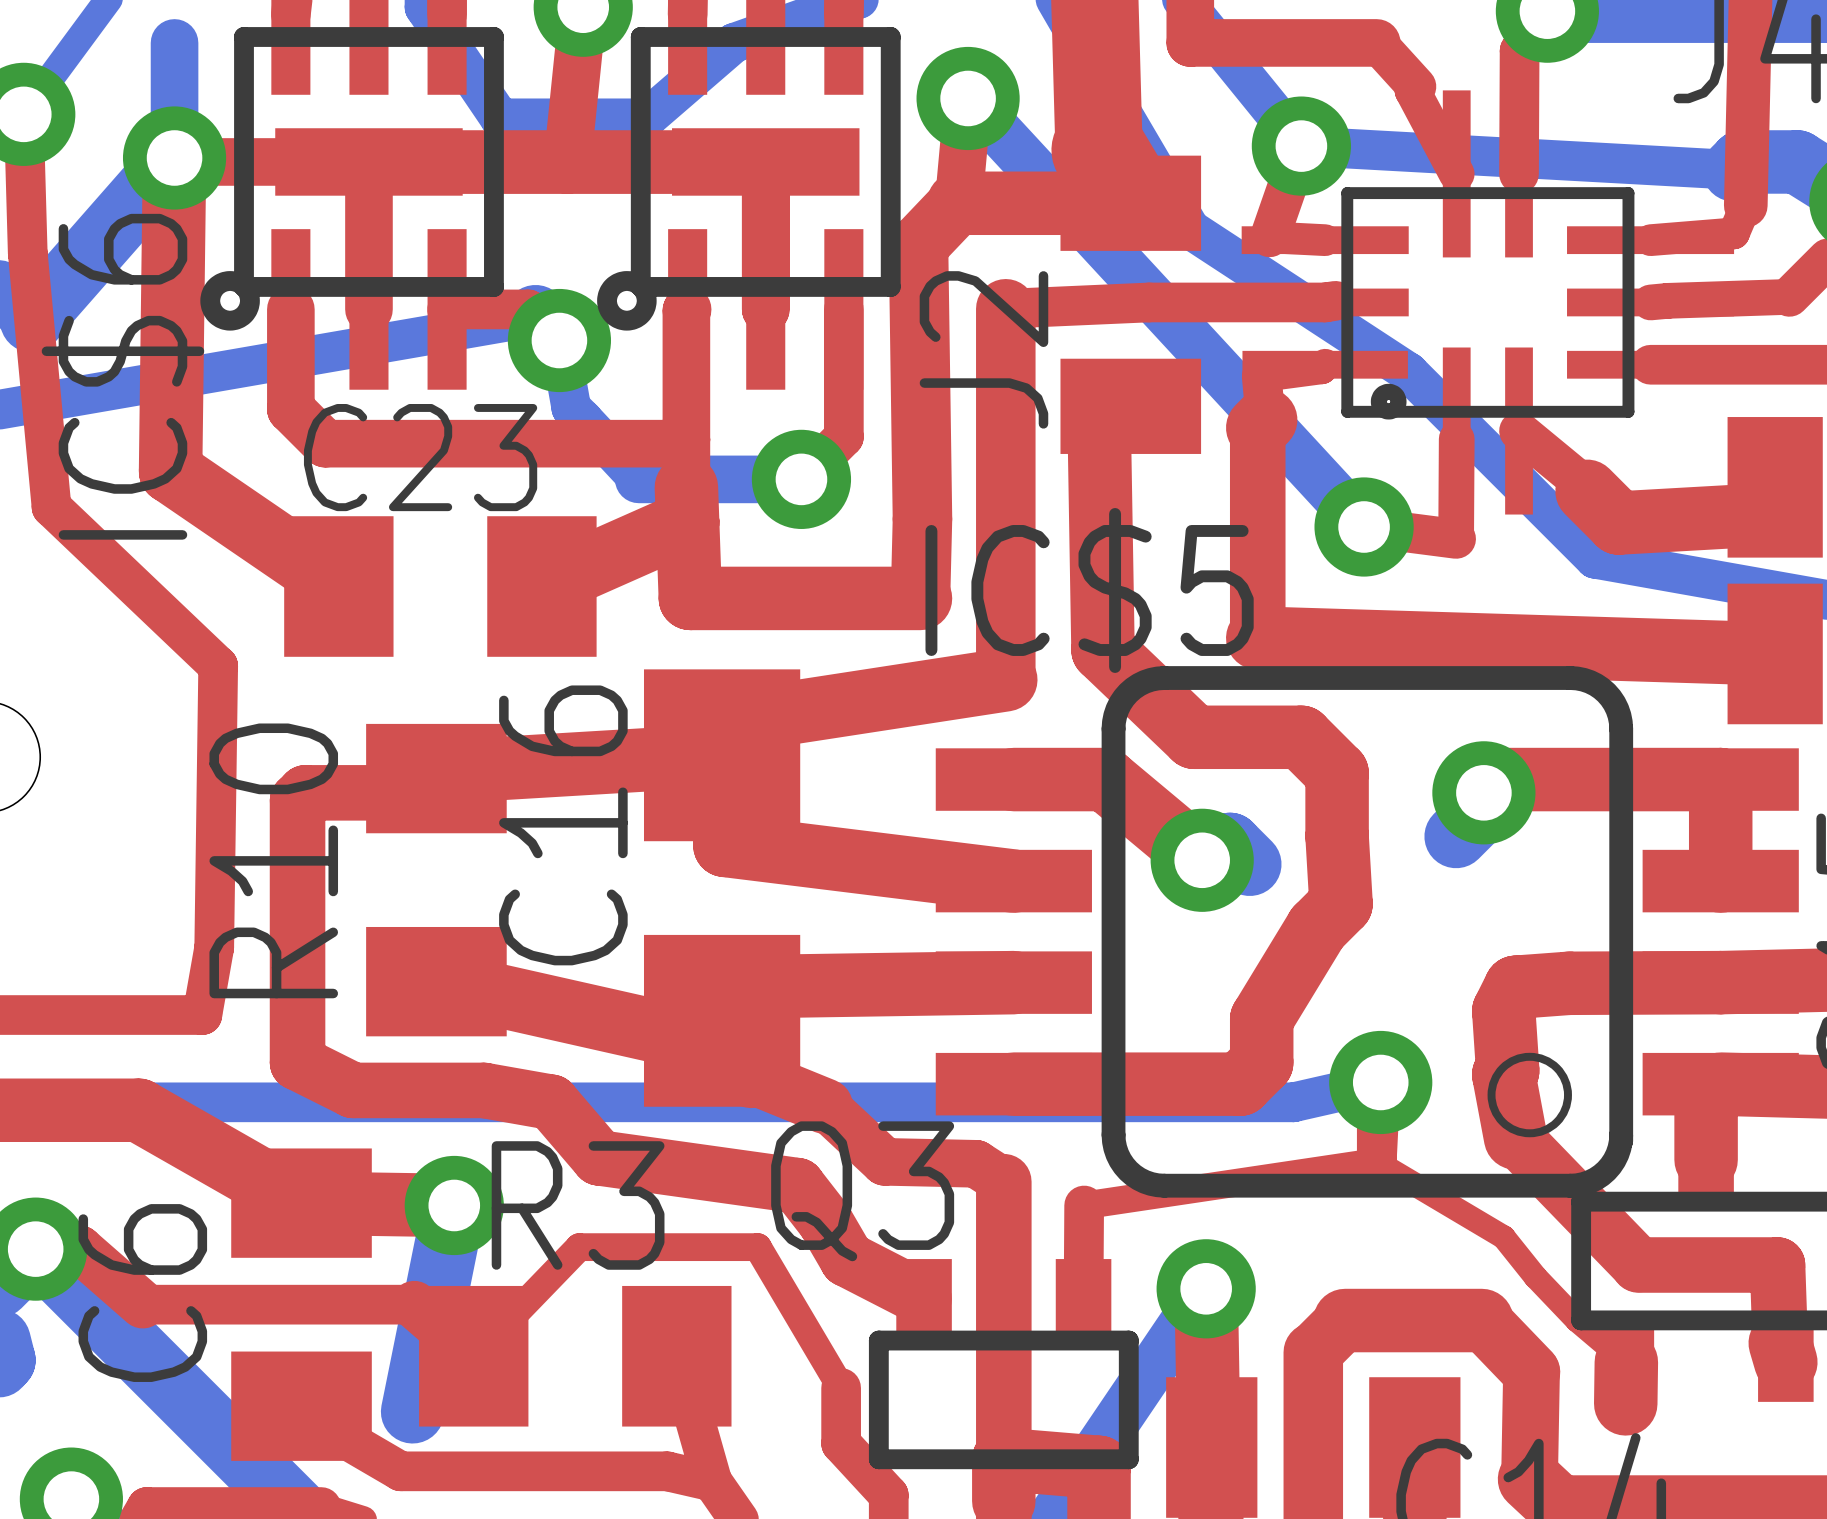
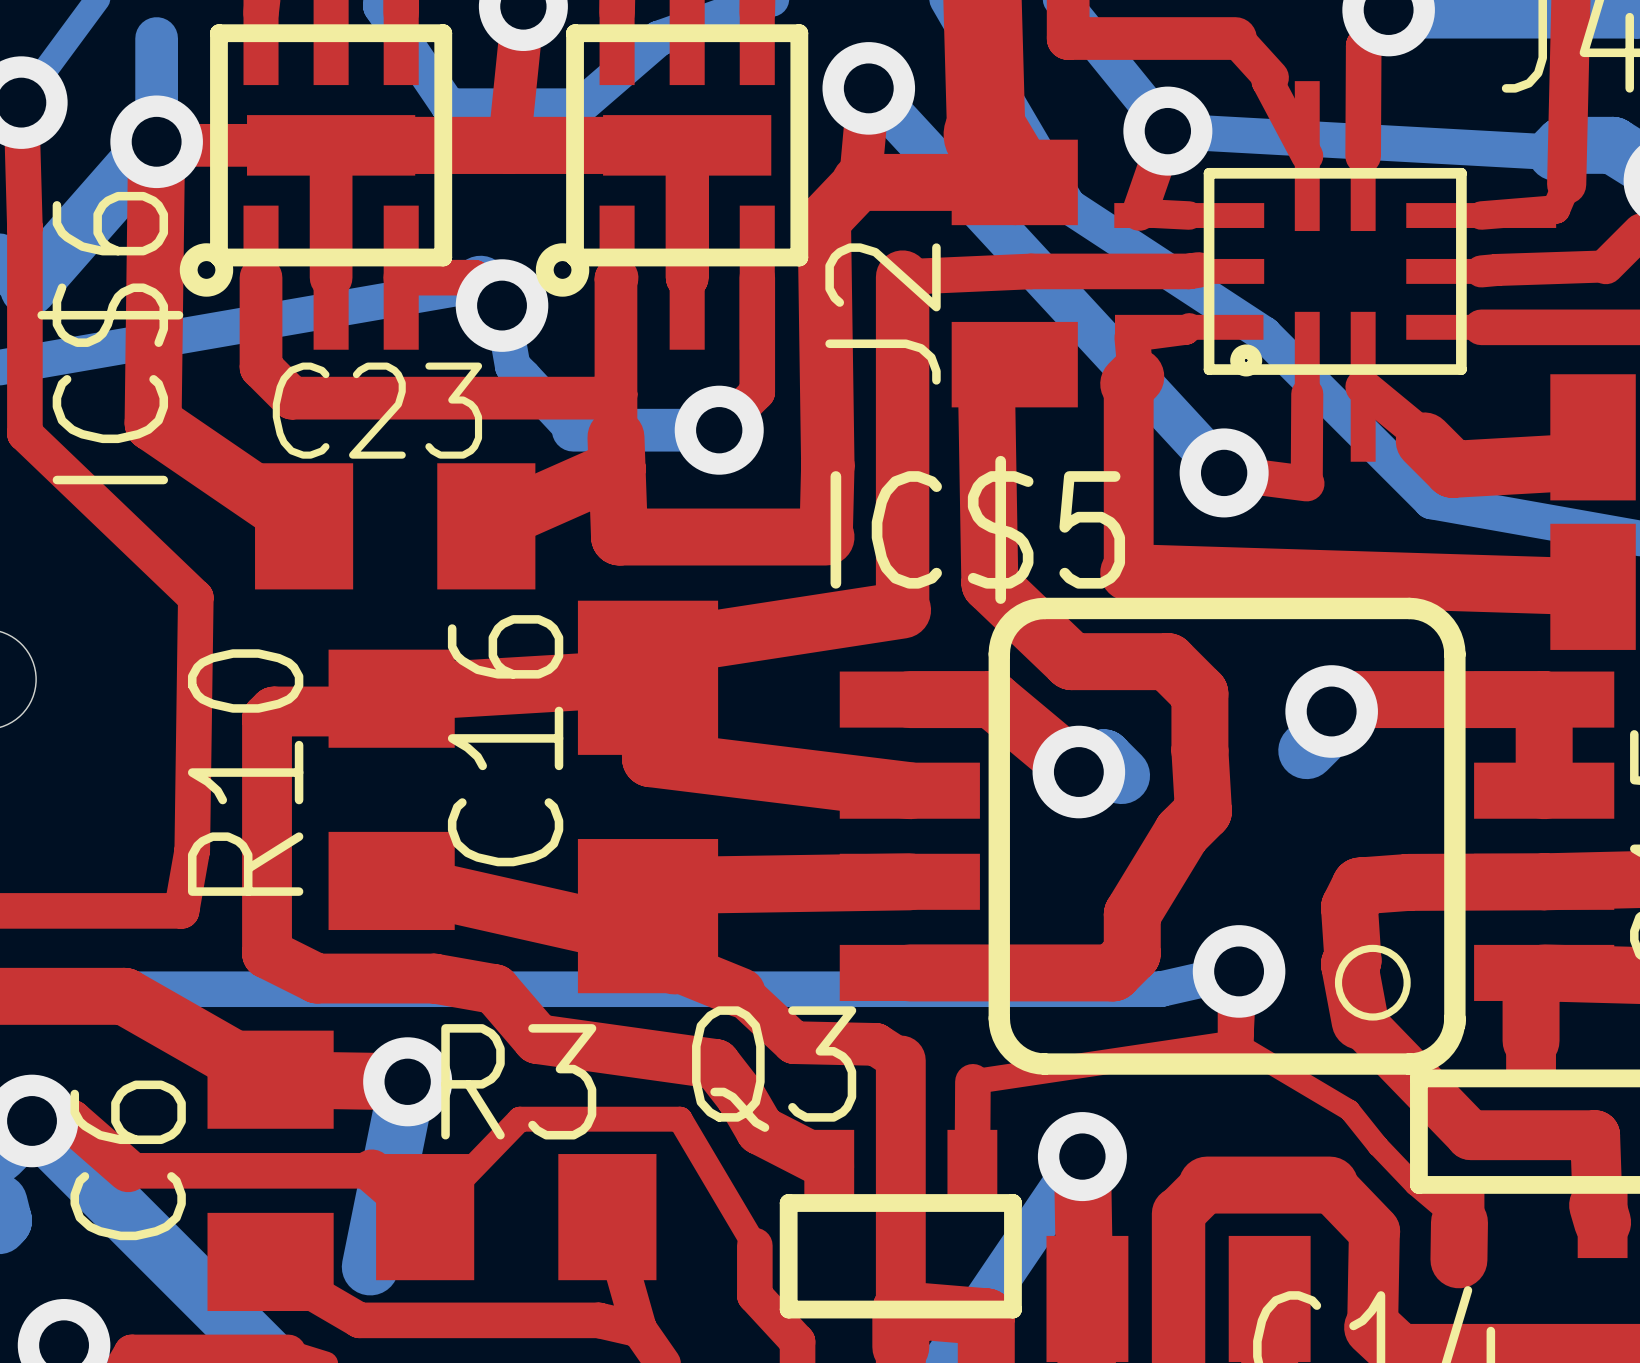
top track: (27, 253) (51, 507) (218, 665) -> (24, 227) (24, 433) (195, 597)

